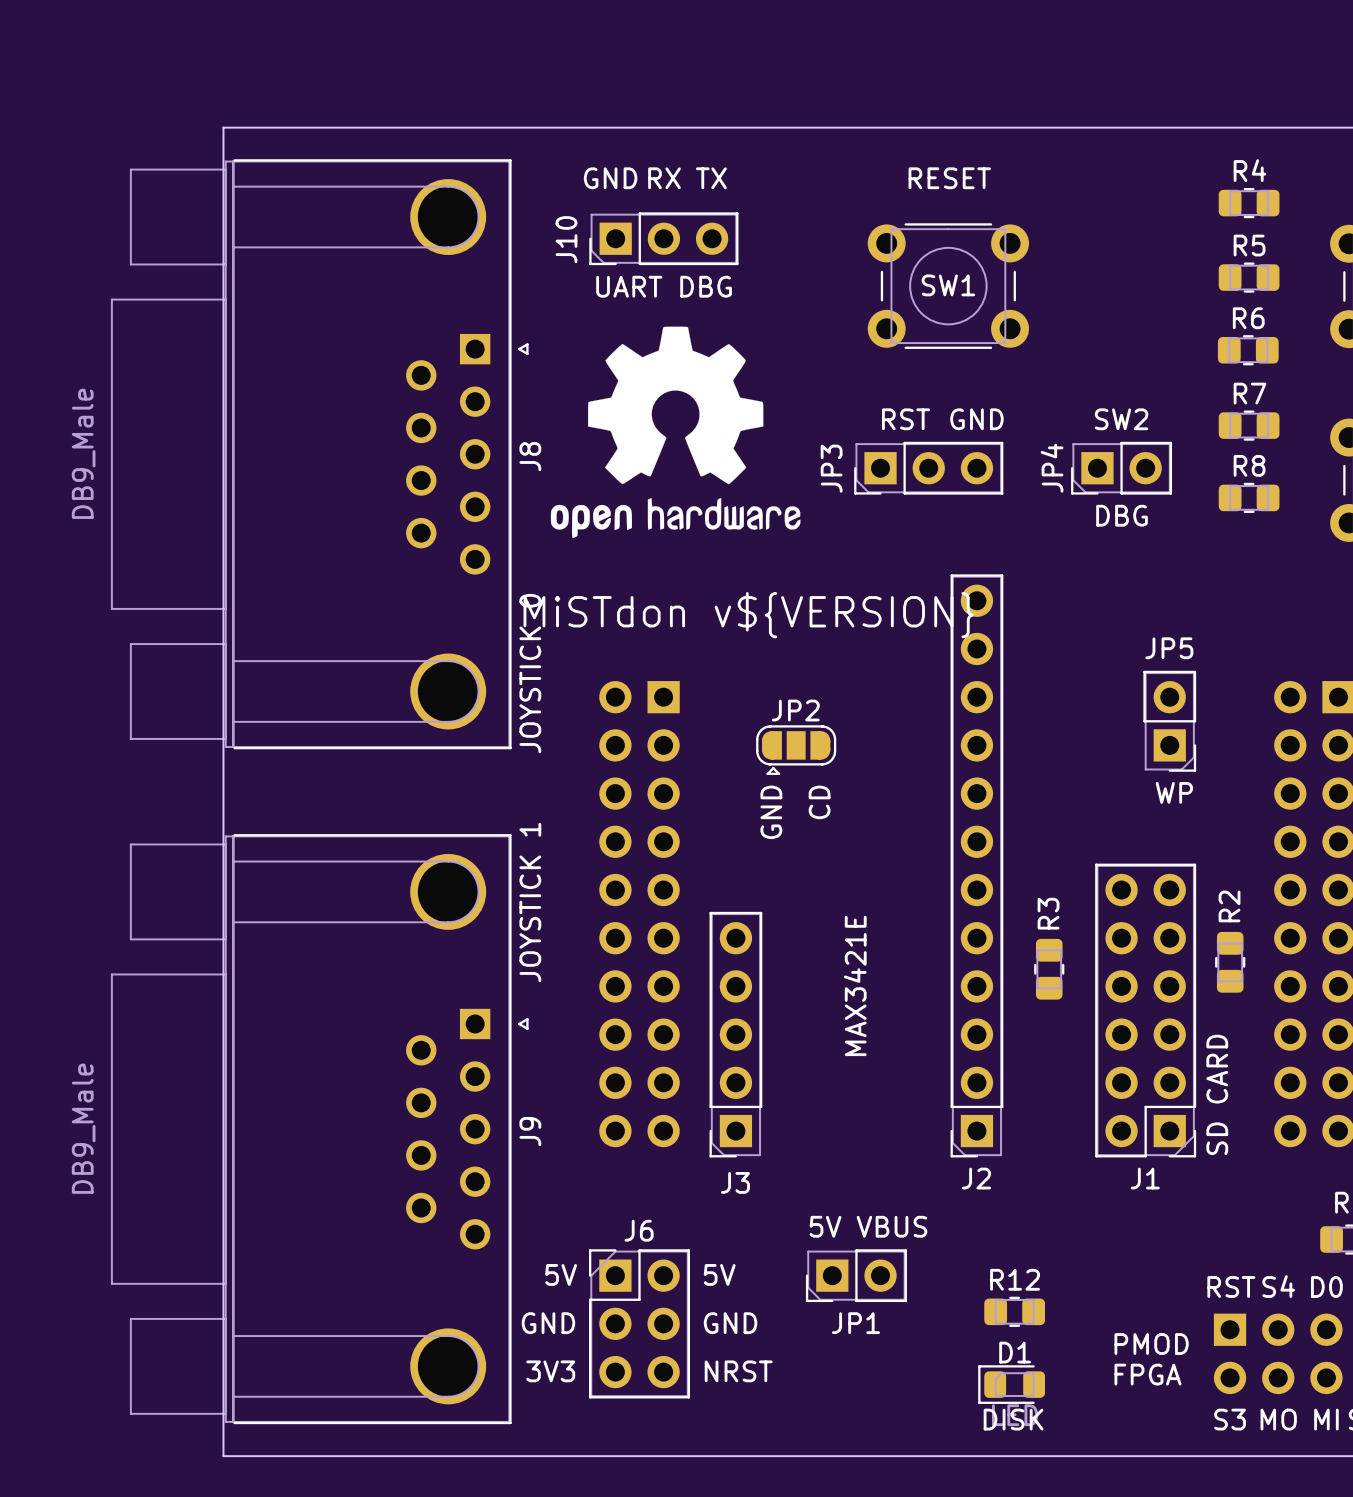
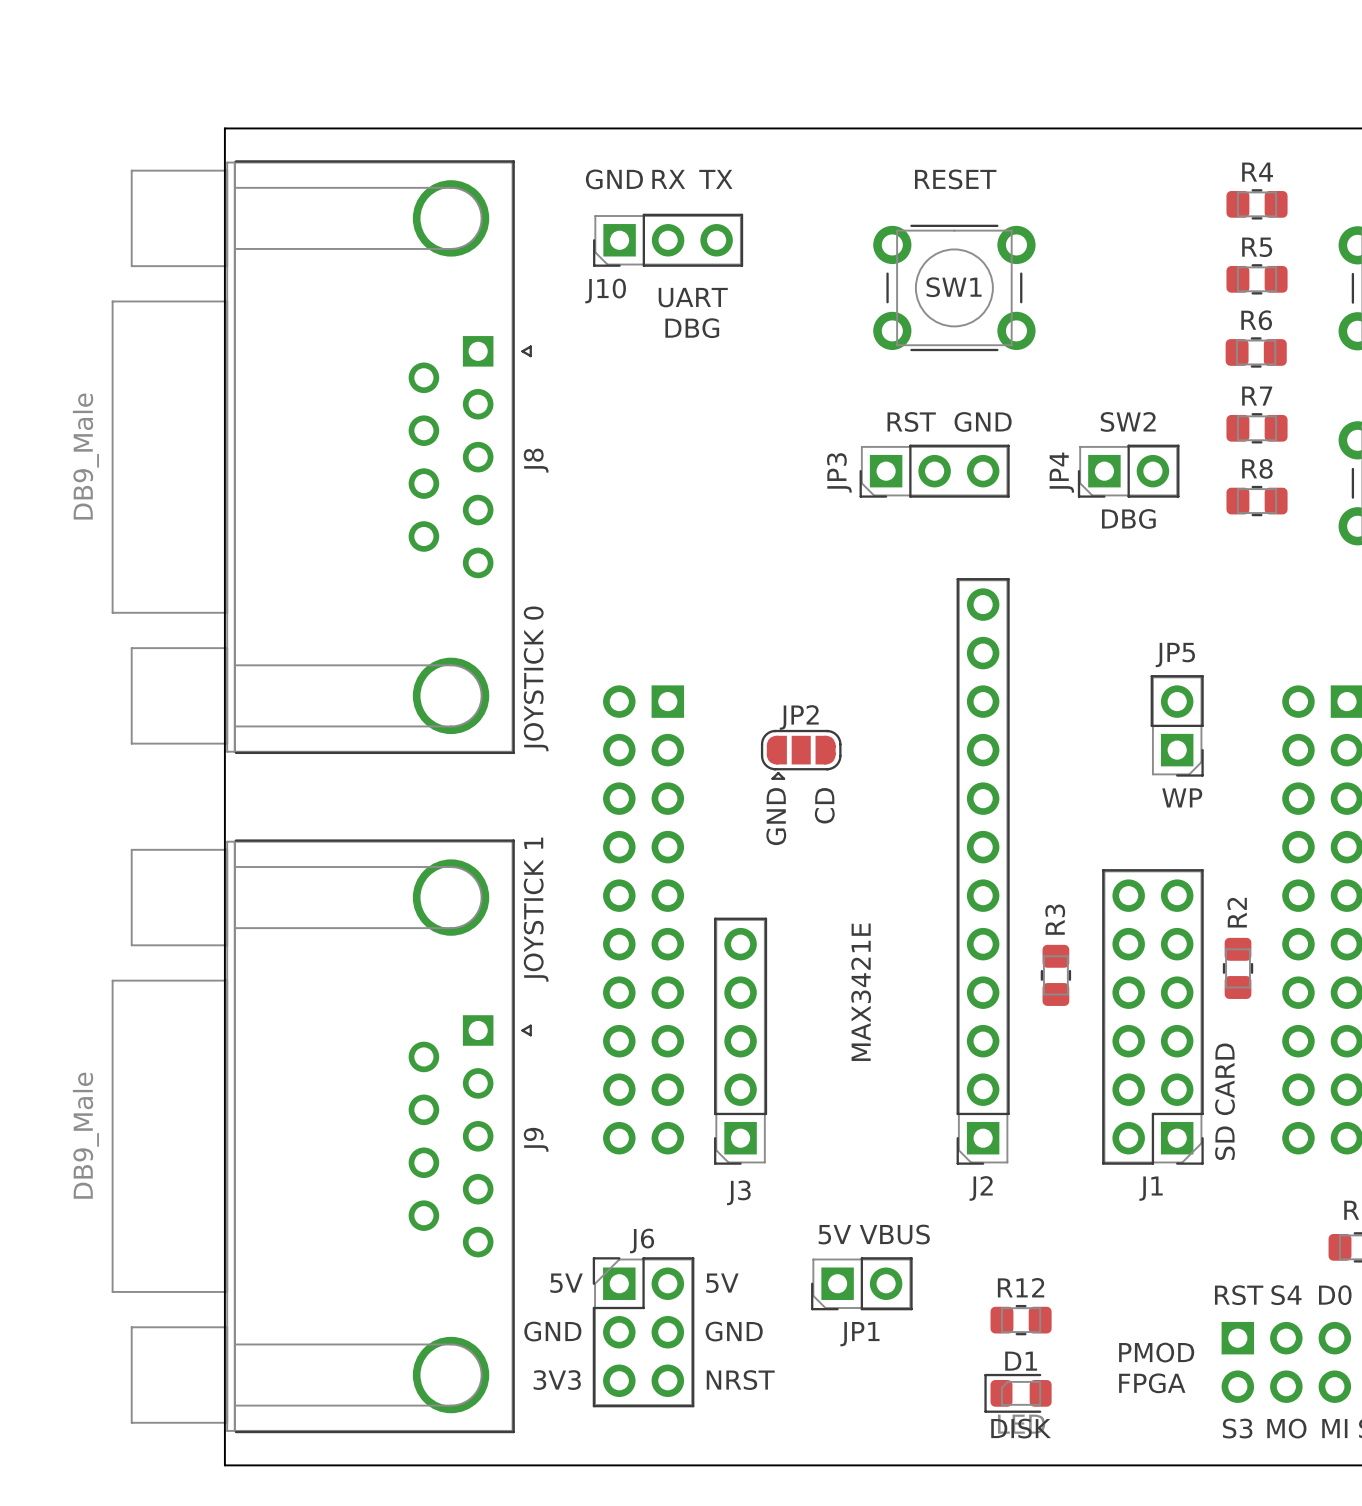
J10 name rotation: 0° (566, 239) -> 90° clockwise (605, 290)
text: UART DBG (664, 286) -> UART (693, 297)
drawing: [550, 326, 801, 538] -> none
text: none -> DBG (692, 328)
text: MiSTdon v${VERSION} (748, 615) -> none

